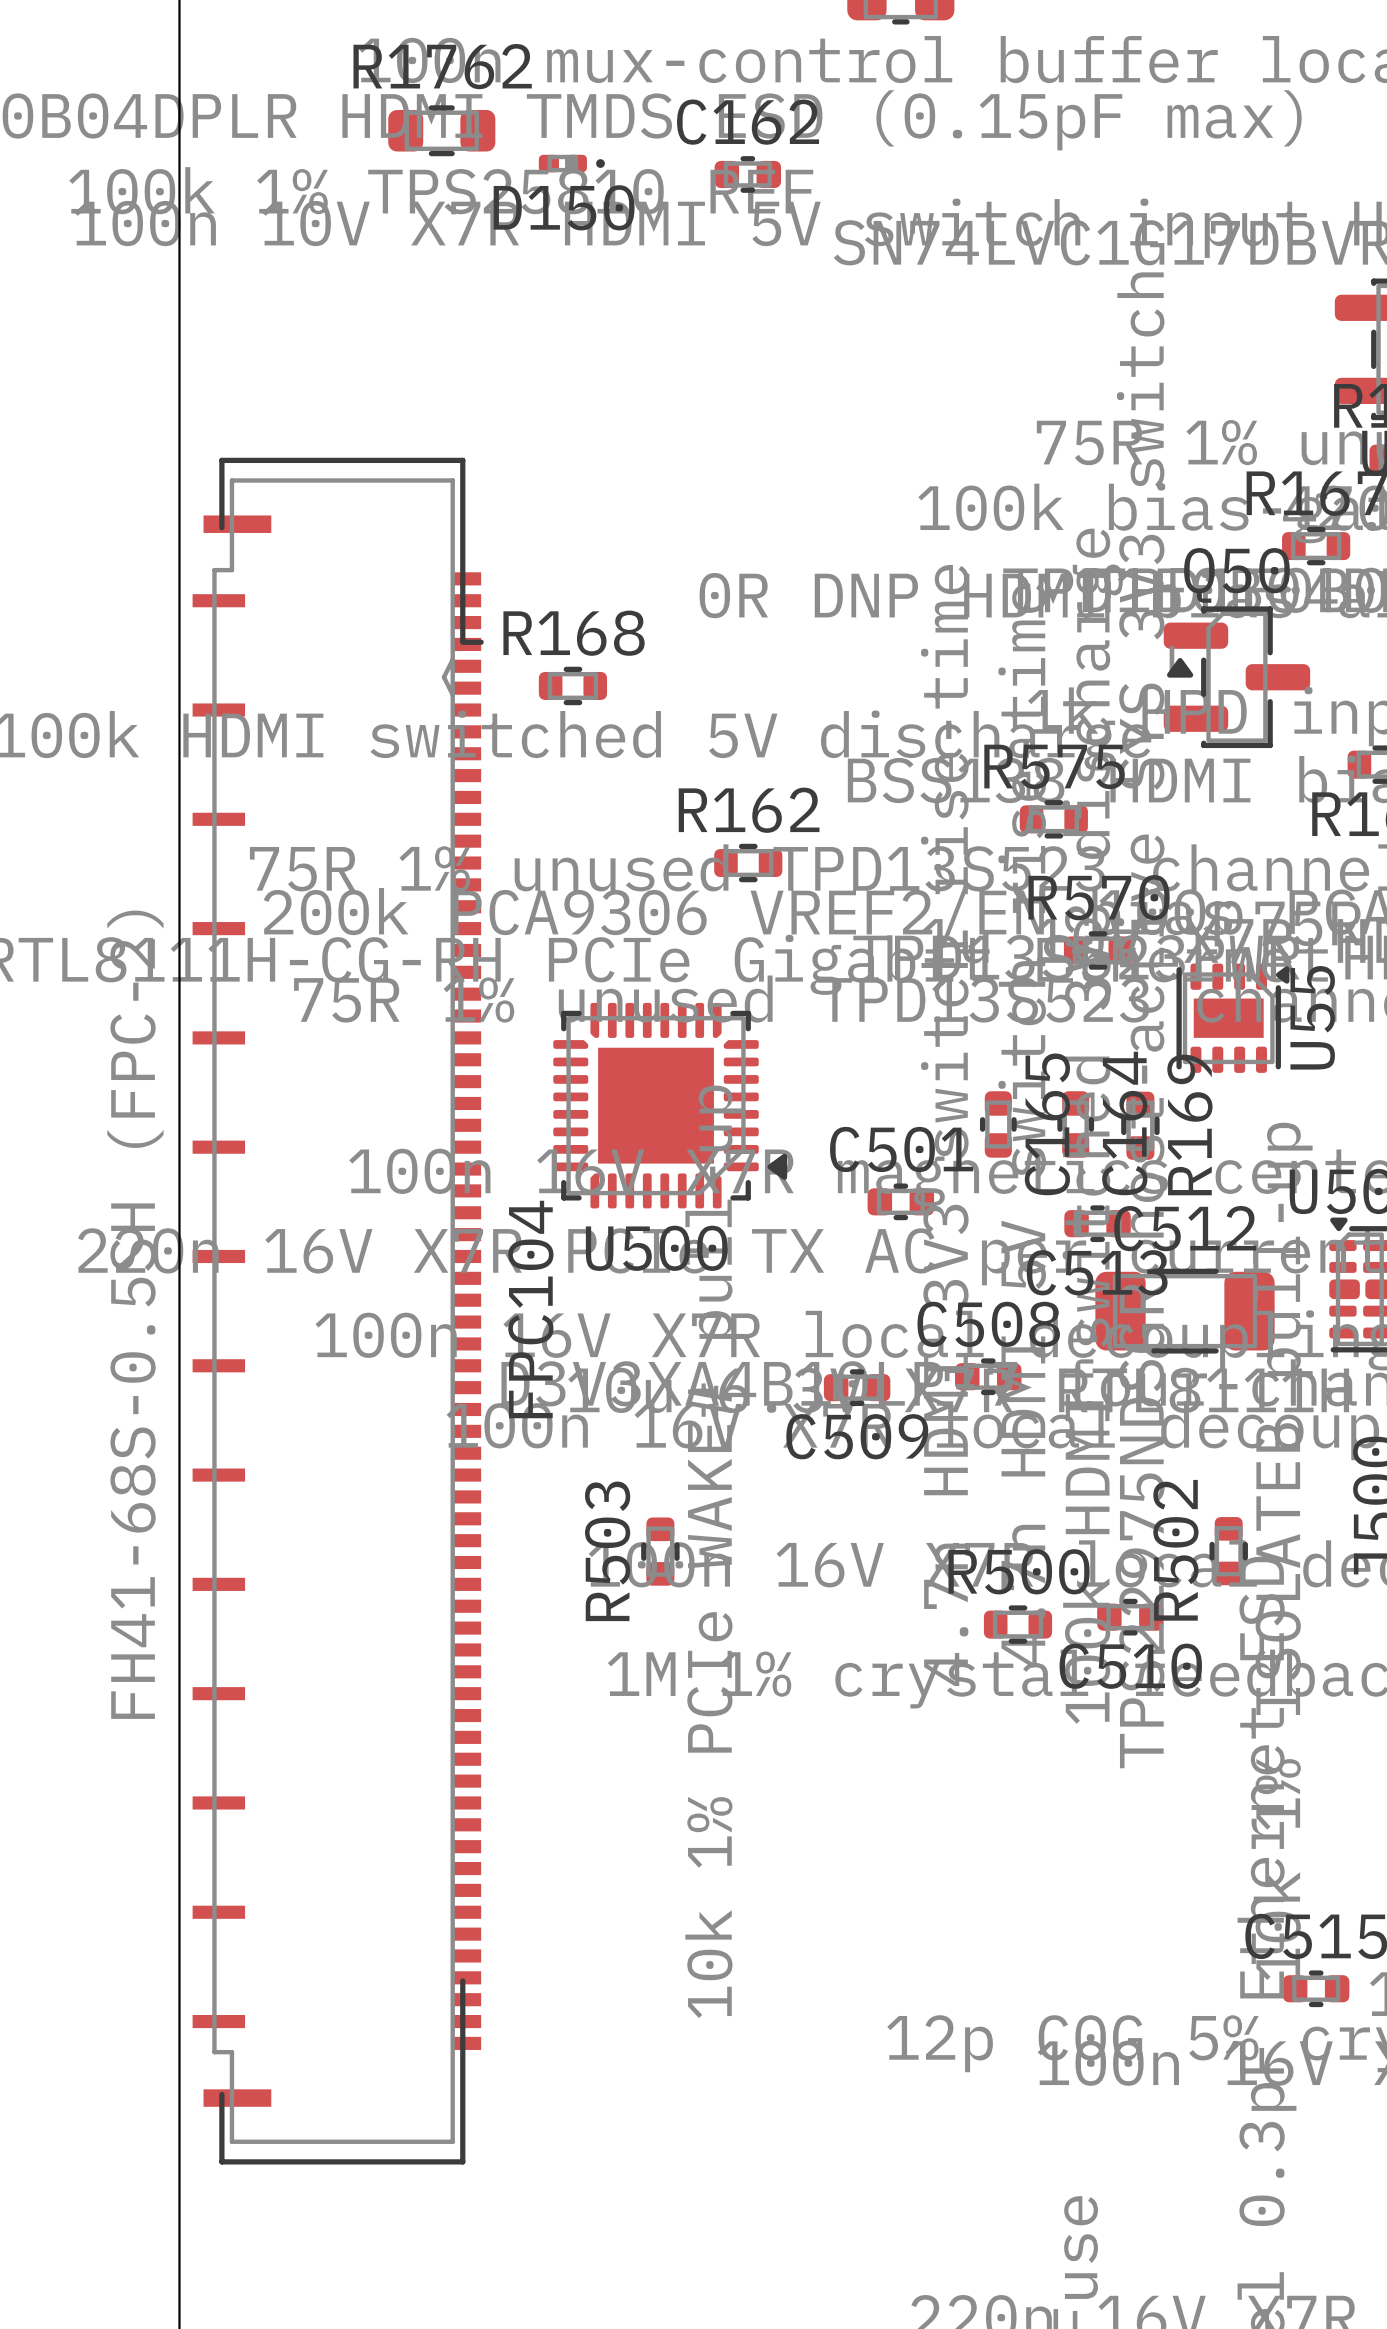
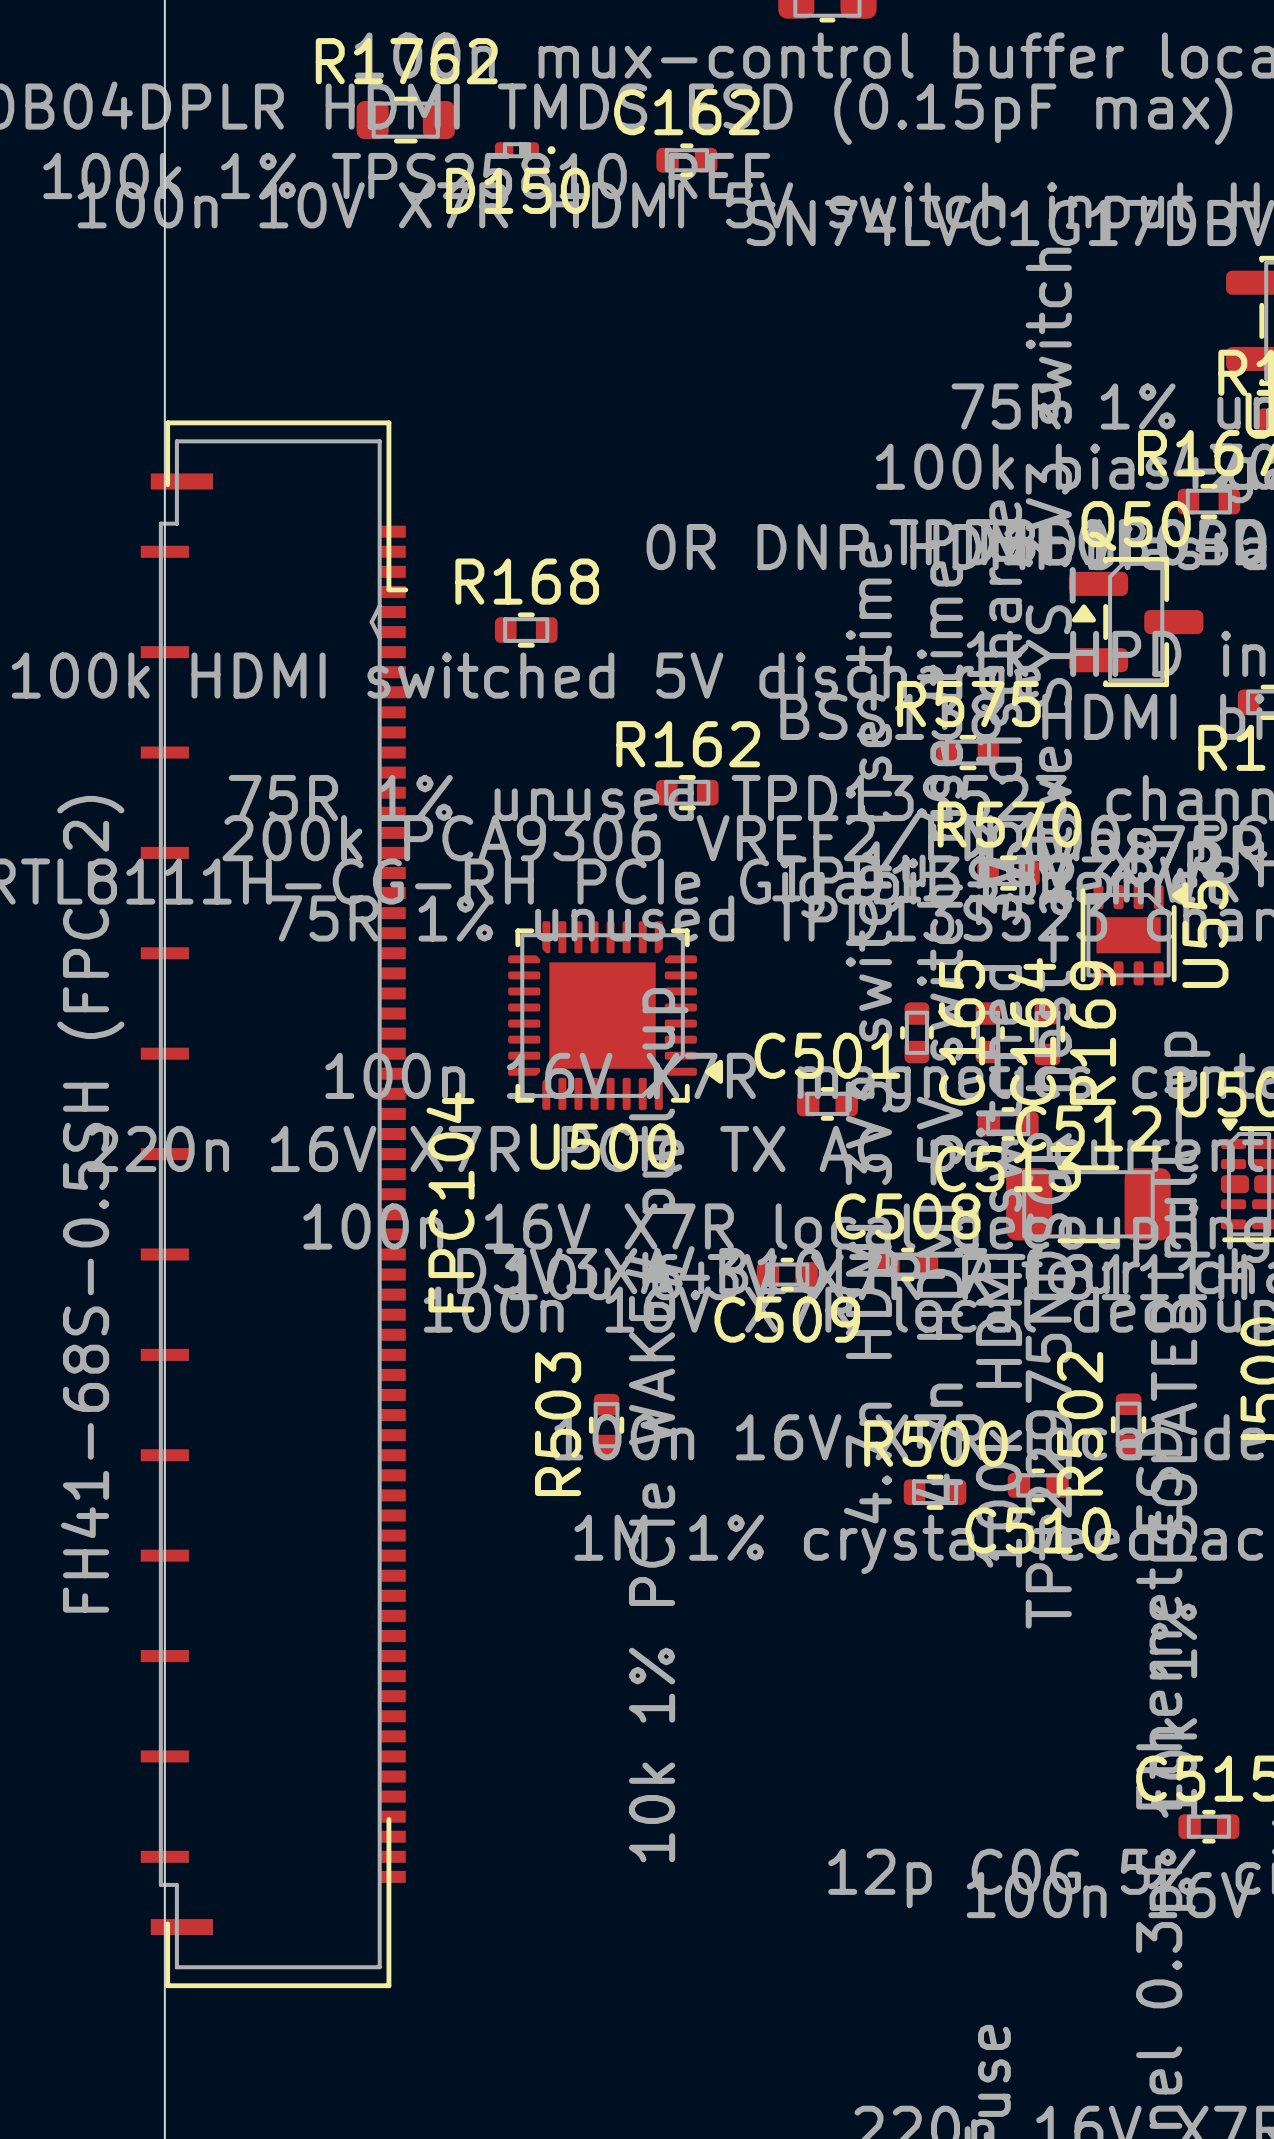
FPC104 position: (338, 1311) -> (274, 1204)

